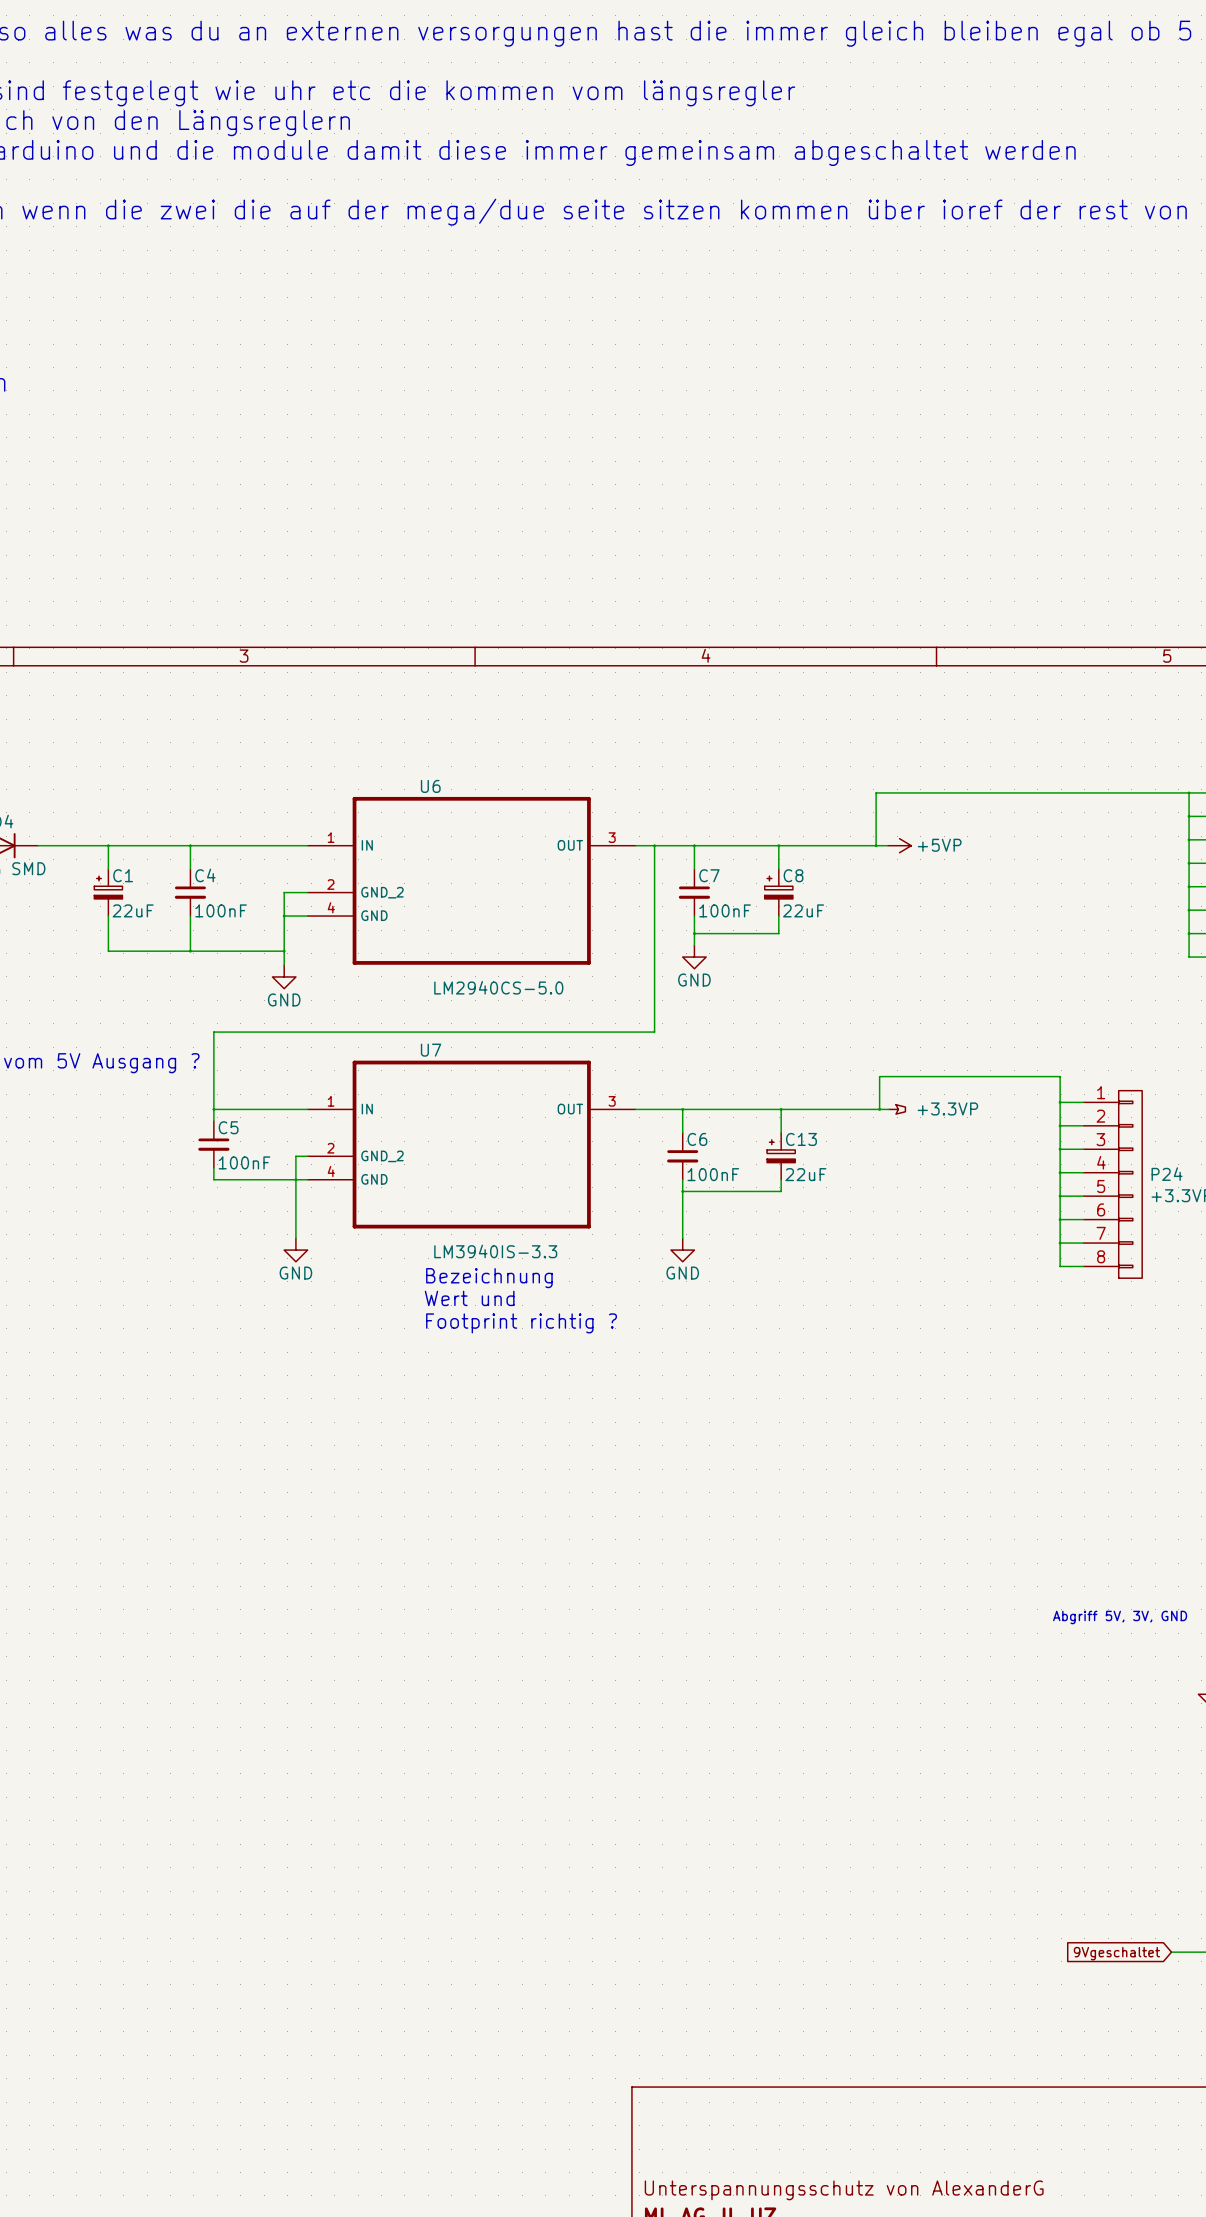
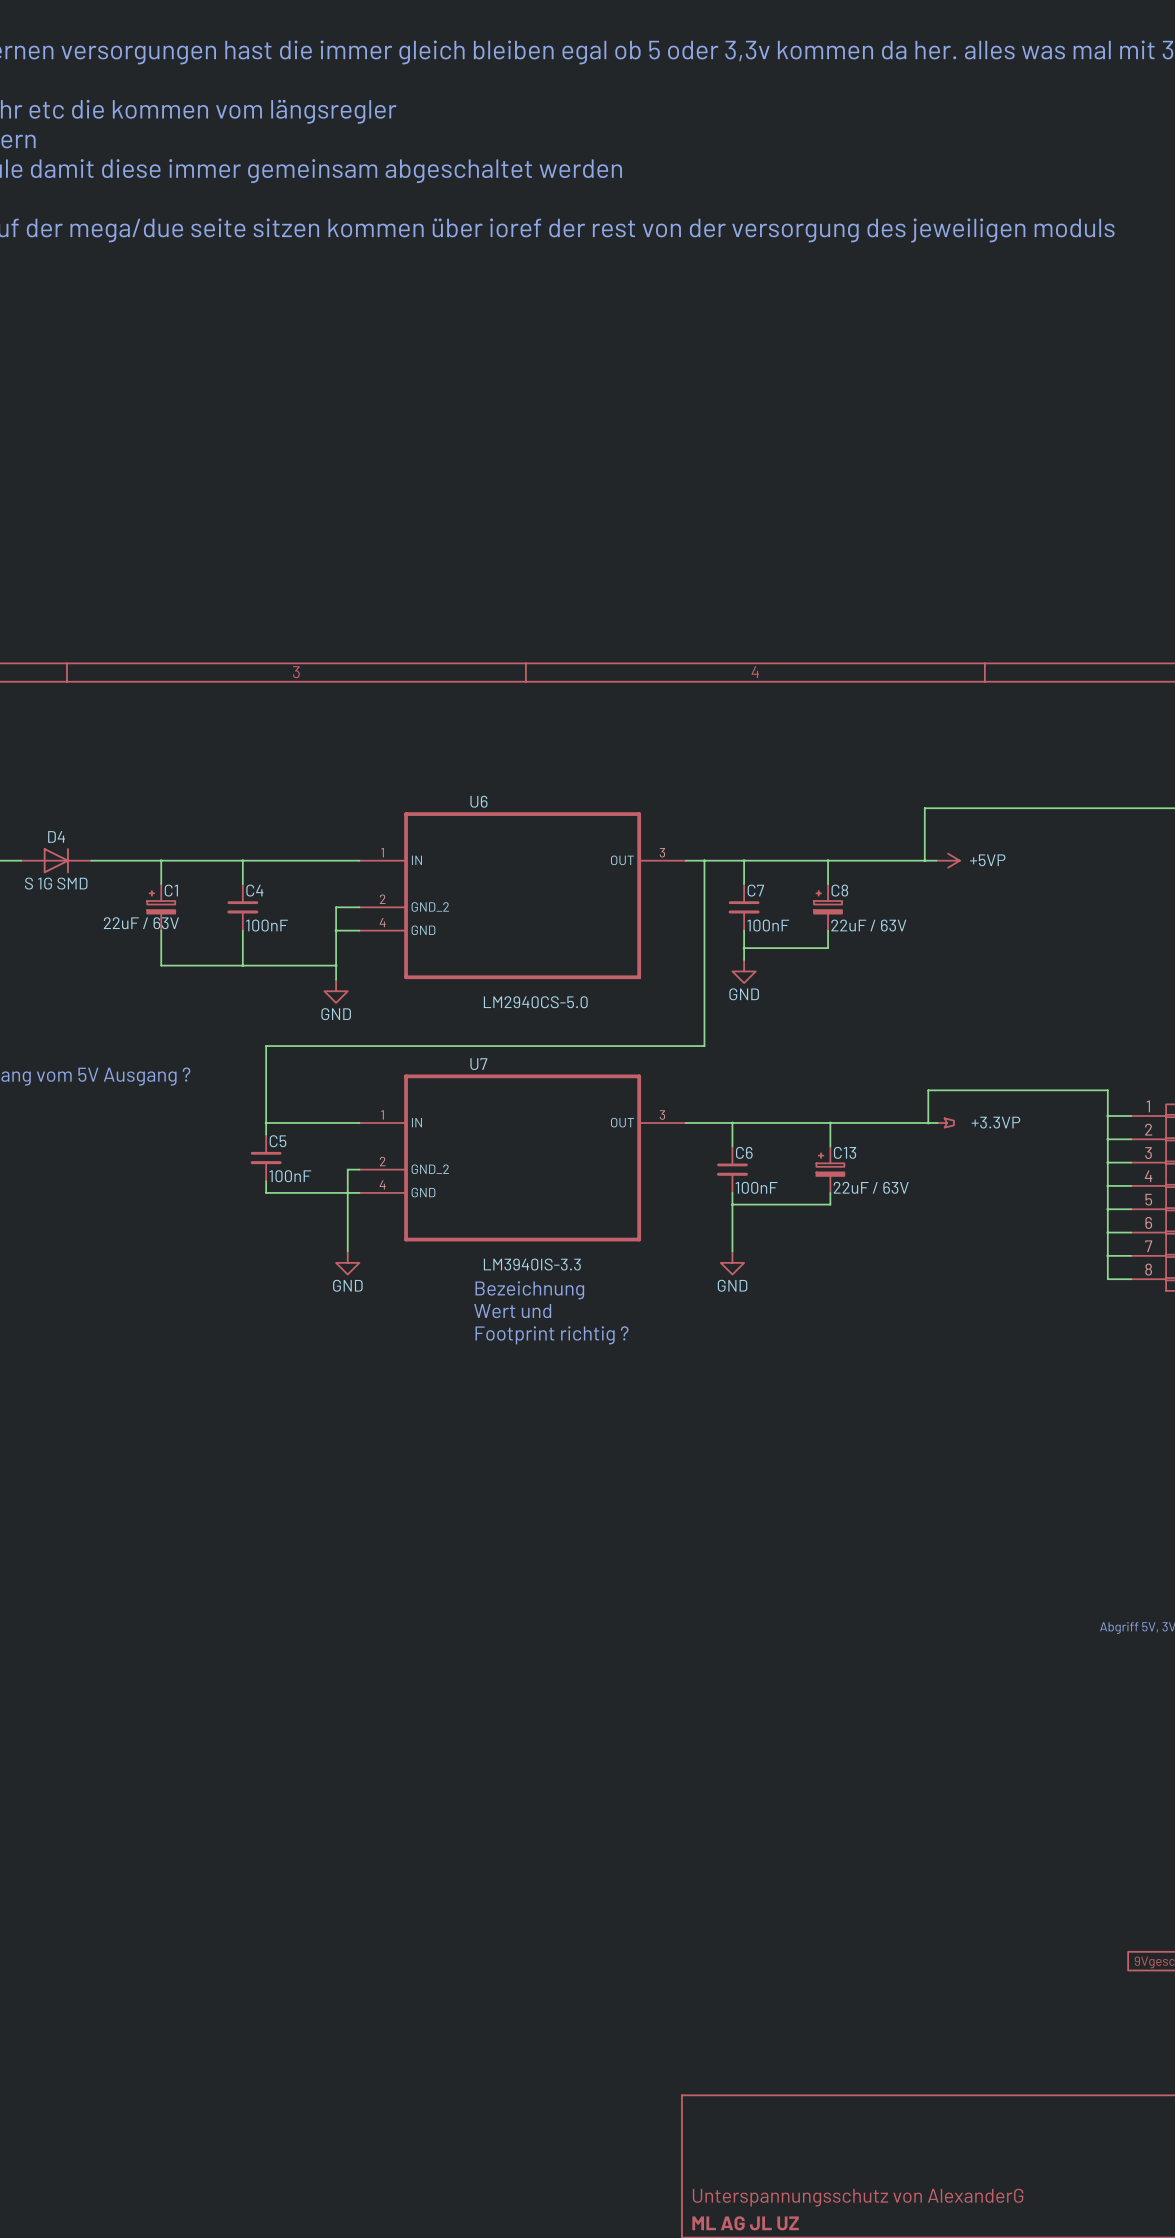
C1 value: 22uF (133, 910) -> 22uF / 63V (141, 923)
C8 value: 22uF (803, 910) -> 22uF / 63V (868, 925)
C13 value: 22uF (805, 1174) -> 22uF / 63V (871, 1187)

